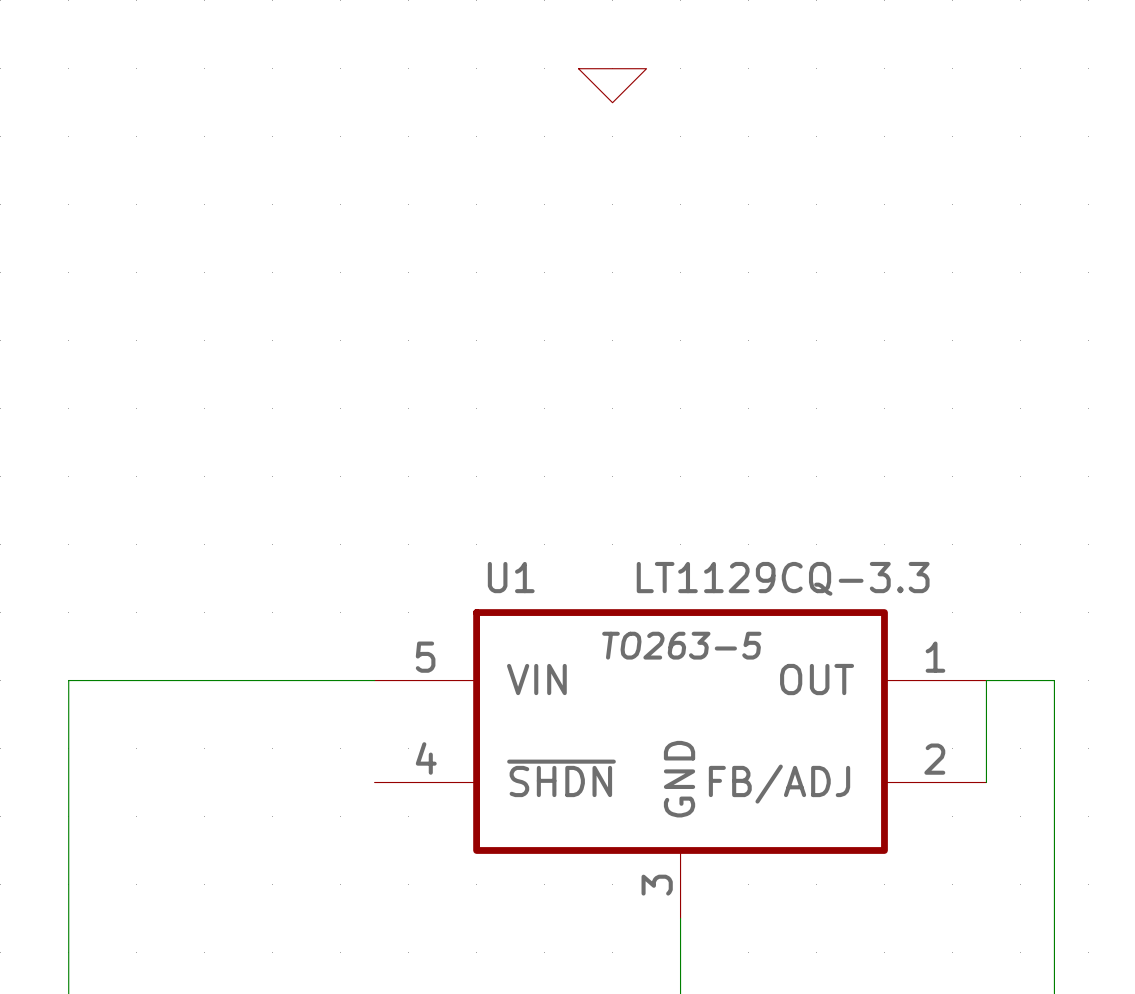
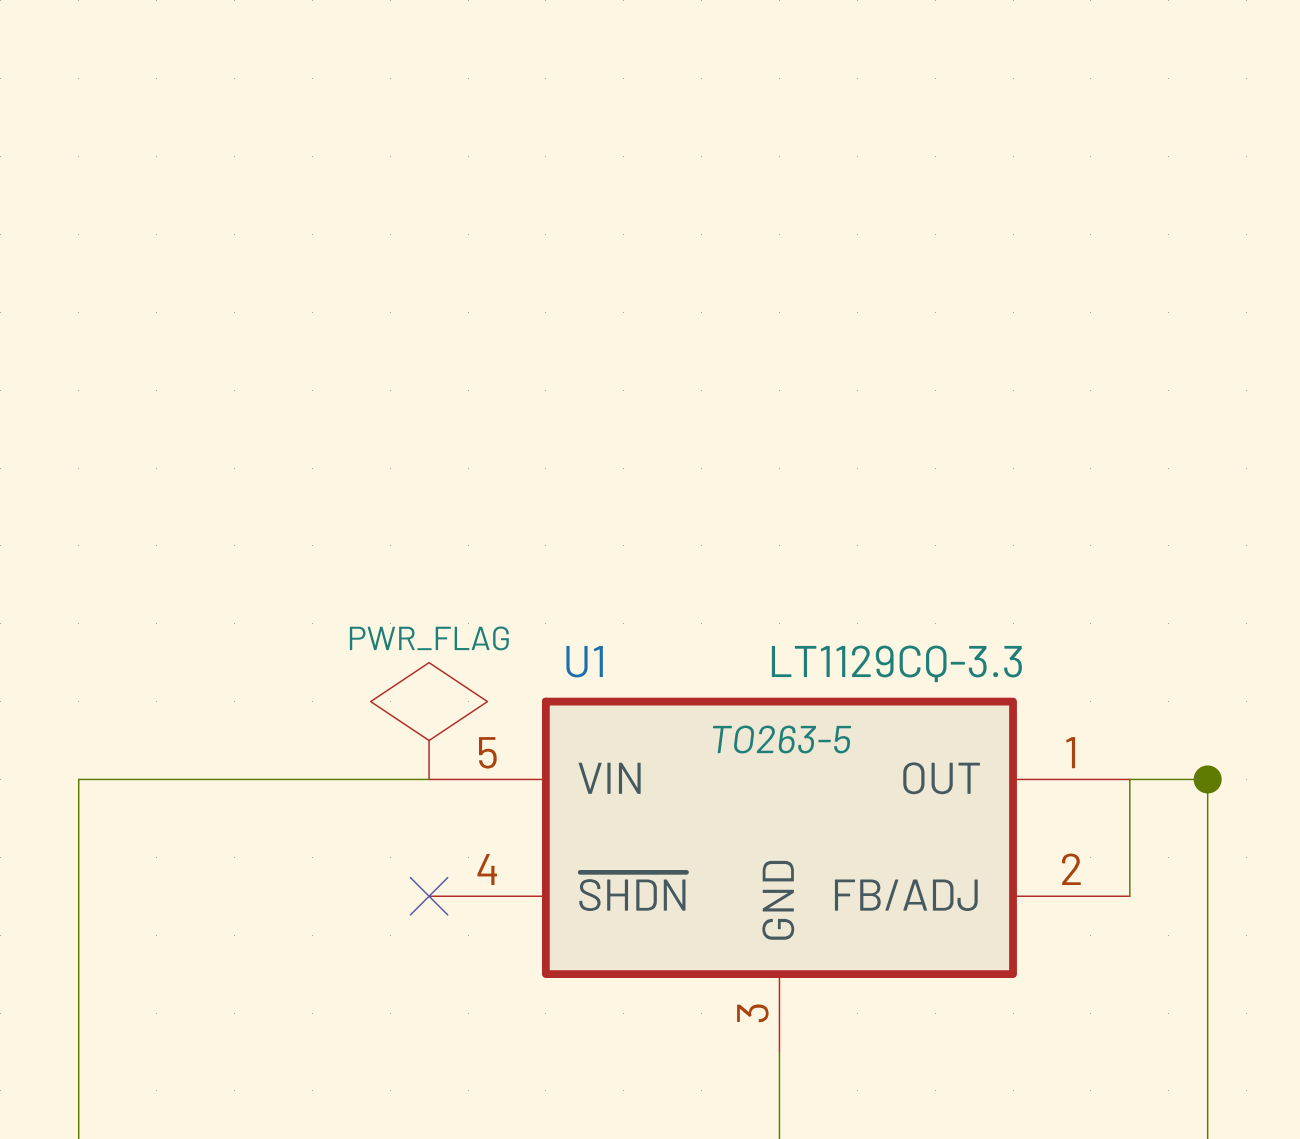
power symbol: (612, 85) -> none
power symbol: none -> PWR_FLAG (429, 721)
junction: none -> (1207, 779)
no-connect mark: none -> (429, 896)

